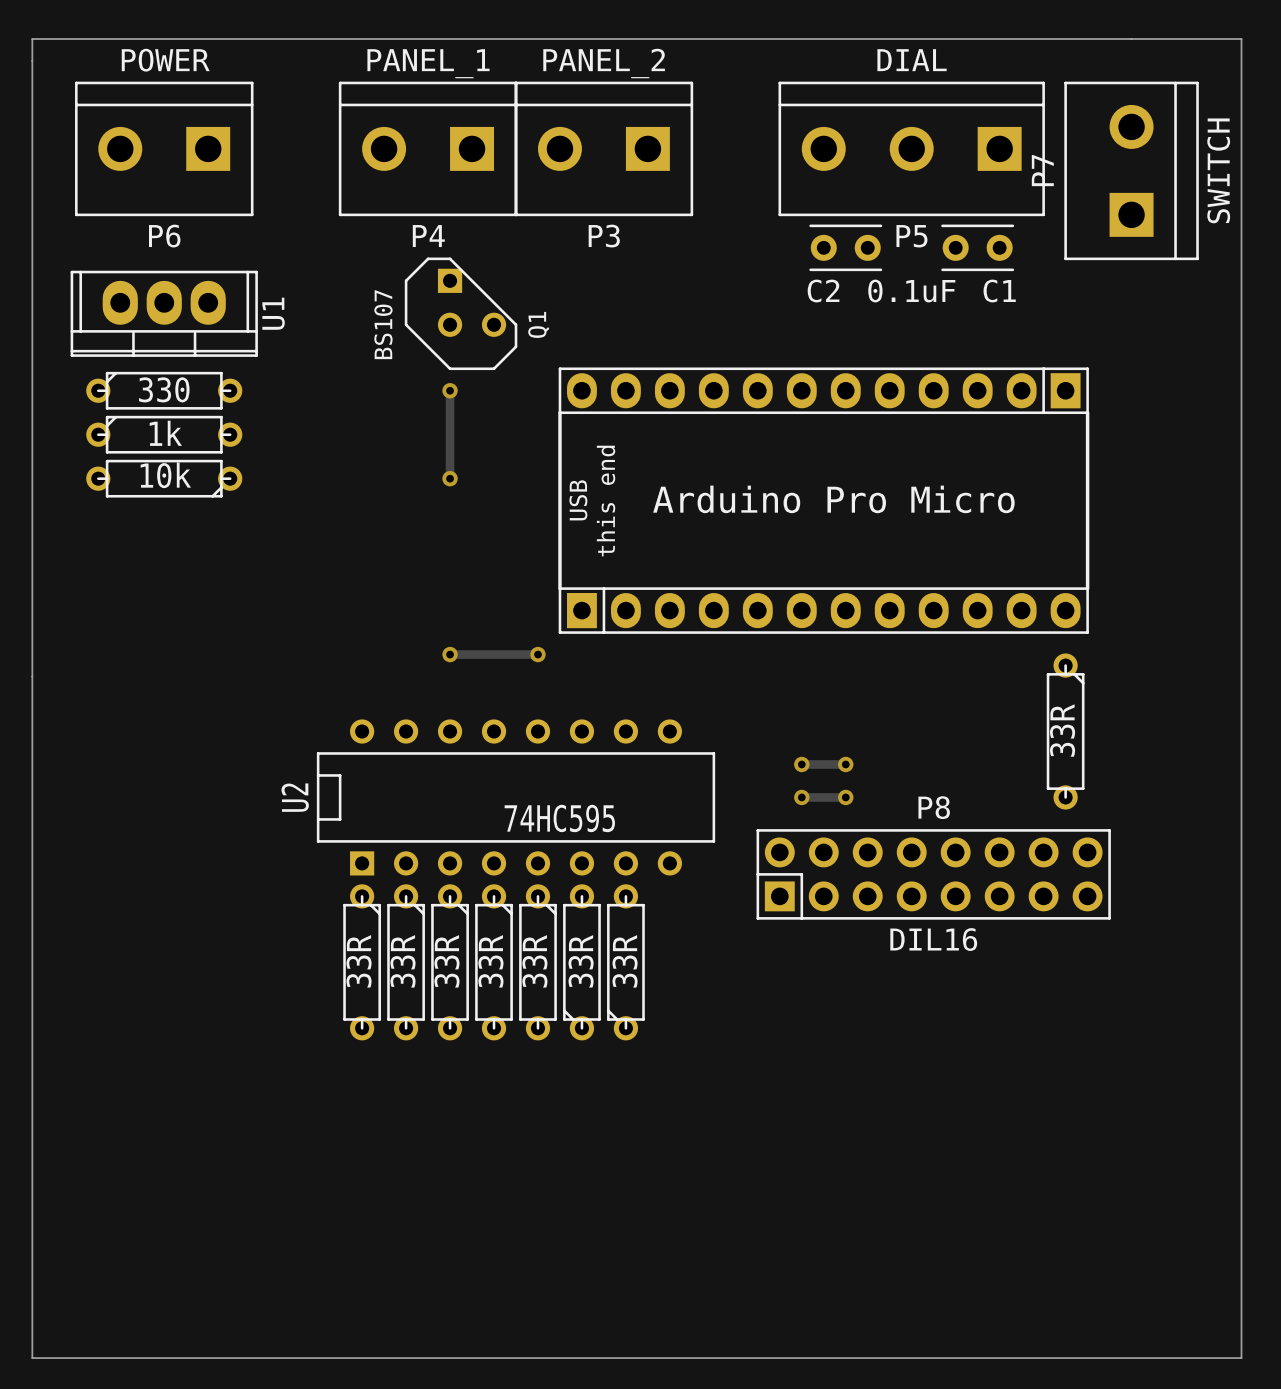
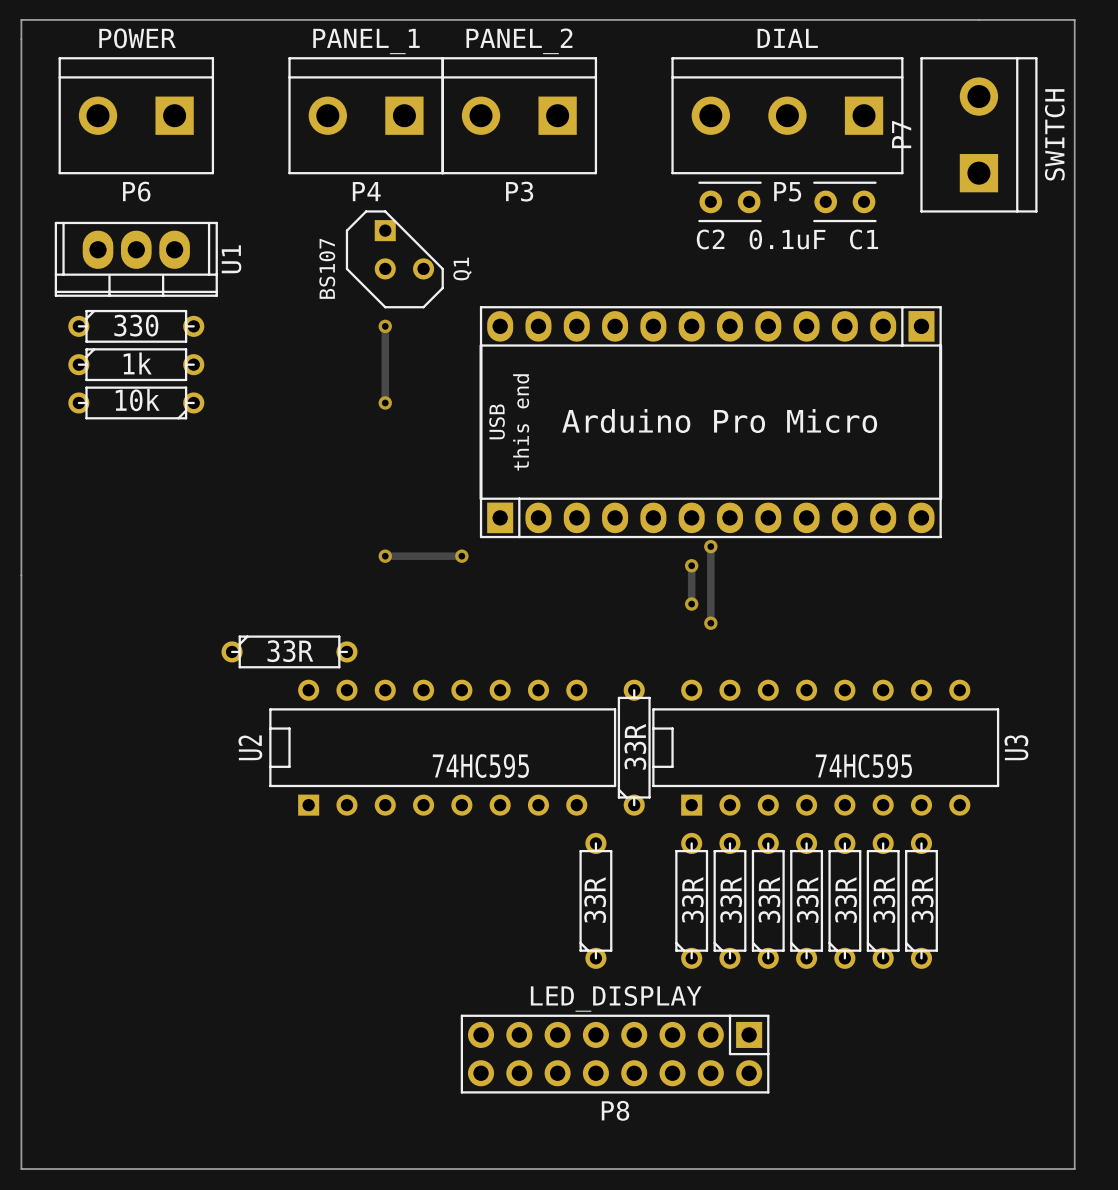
track: none -> (710, 546) (710, 623)
via: none -> (710, 546)
track: none -> (691, 565) (691, 604)
via: none -> (691, 565)
via: none -> (691, 604)
via: none -> (710, 623)
part: 33R (1065, 731) -> none
part: none -> 33R (289, 651)
track: (801, 764) (845, 764) -> none
via: (801, 764) -> none
via: (845, 764) -> none
U2 position: (516, 797) -> (442, 747)
track: (801, 797) (845, 797) -> none
via: (801, 797) -> none
via: (845, 797) -> none
part: none -> 33R (634, 747)
P8 rotation: 0° (933, 874) -> 180° (615, 1054)
P8 position: (933, 874) -> (615, 1054)
U3: none -> 74HC595 (825, 747)
P8 value: DIL16 (933, 939) -> LED_DISPLAY (616, 998)
part: 33R (362, 962) -> none
part: 33R (406, 962) -> none
part: 33R (450, 962) -> none
part: 33R (494, 962) -> none
part: 33R (537, 962) -> none
part: 33R (581, 962) -> none
part: 33R (625, 962) -> none
part: none -> 33R (595, 900)
part: none -> 33R (691, 900)
part: none -> 33R (729, 900)
part: none -> 33R (768, 900)
part: none -> 33R (806, 900)
part: none -> 33R (844, 900)
part: none -> 33R (883, 900)
part: none -> 33R (921, 900)

